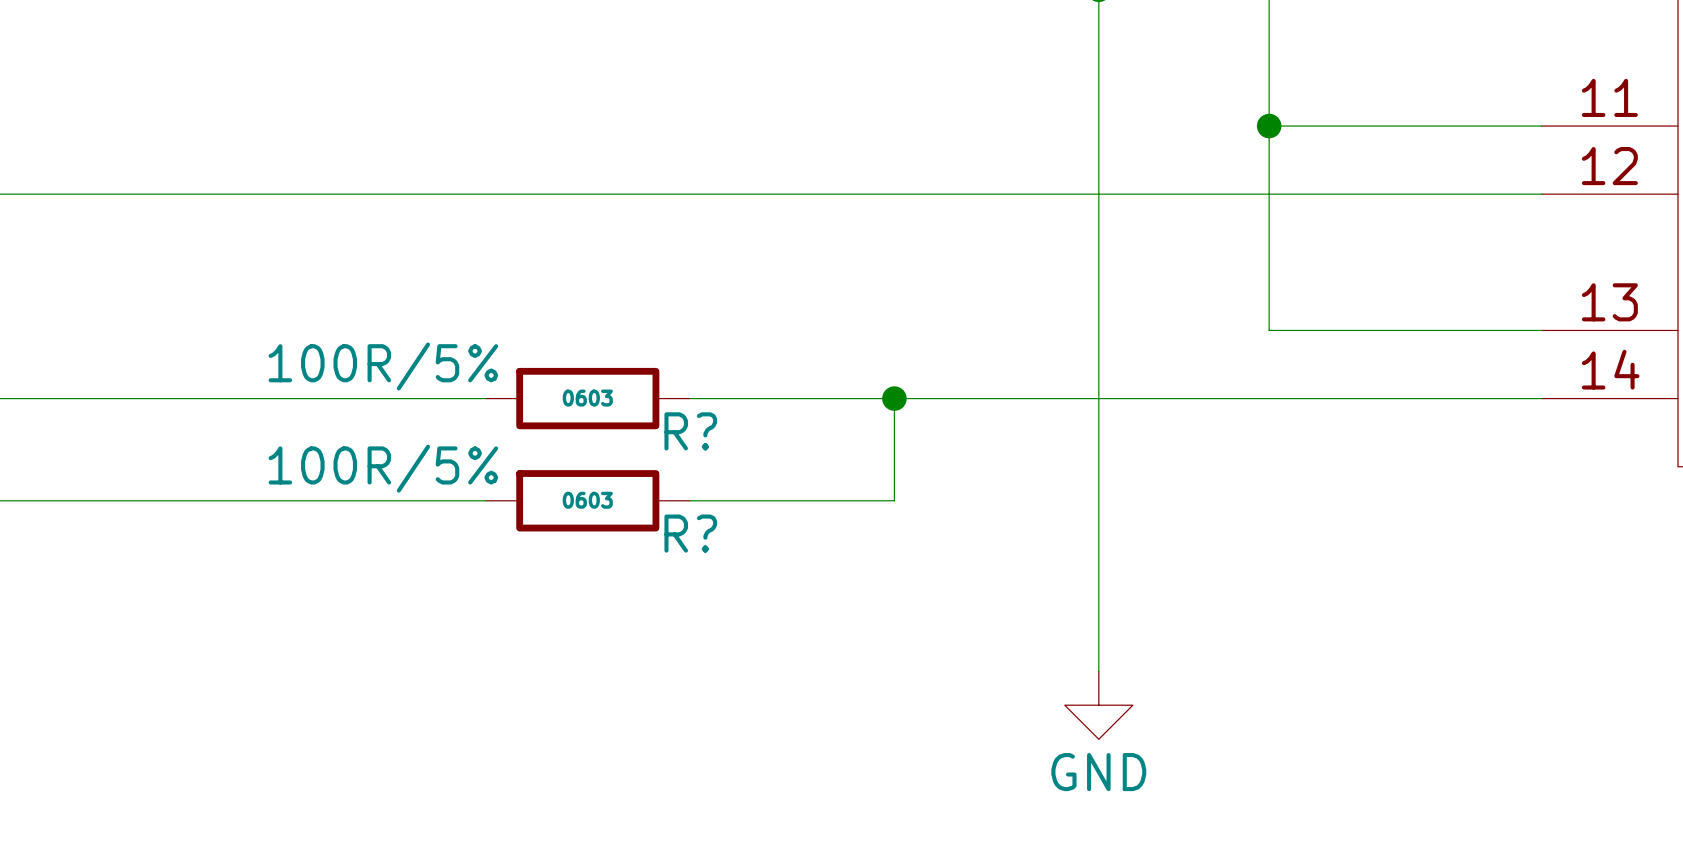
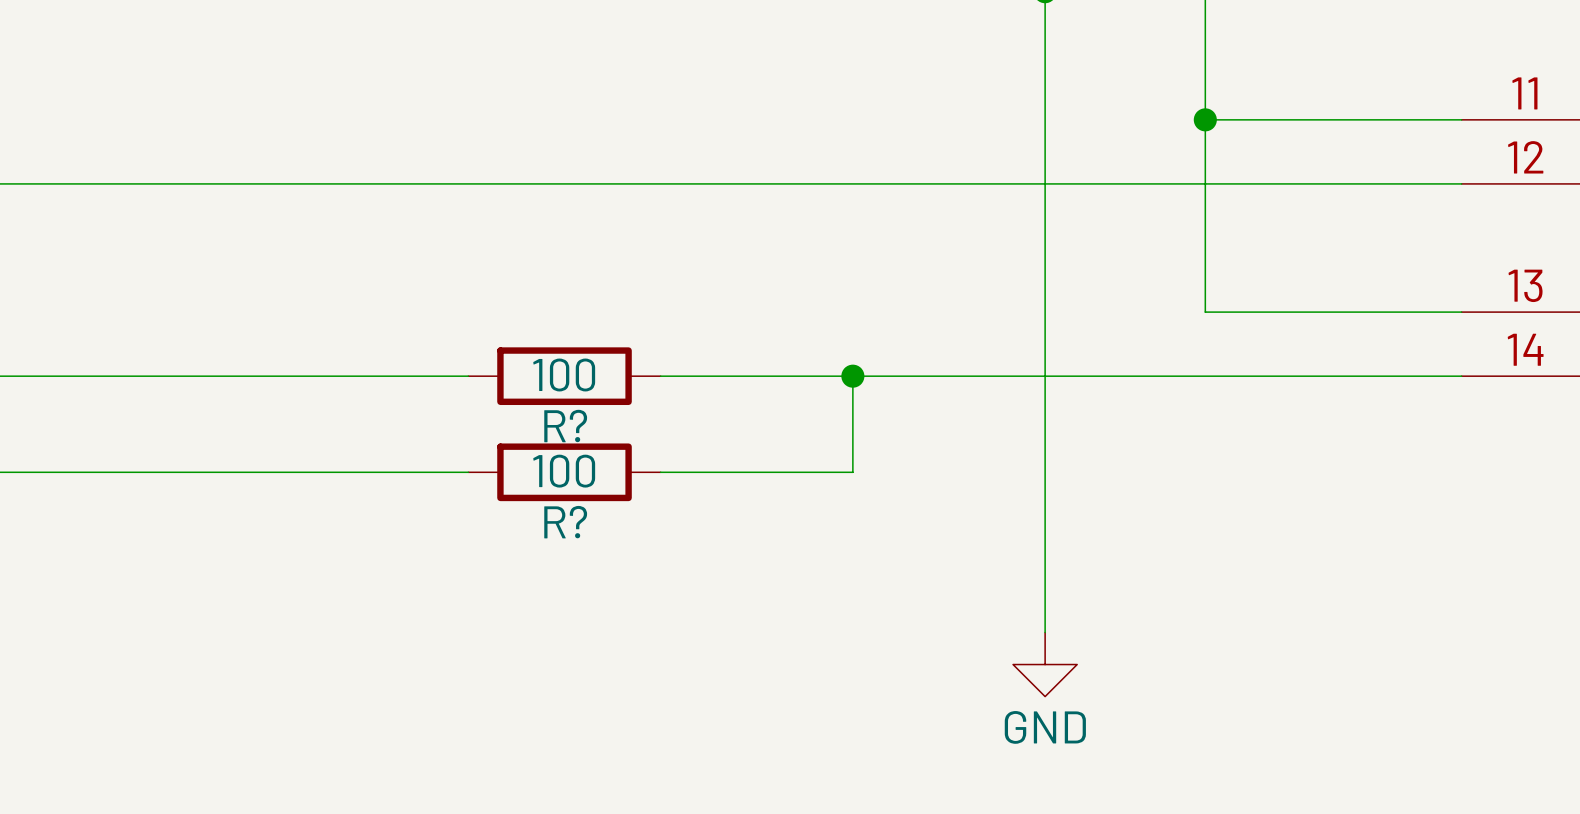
R? value: 100R/5% (383, 366) -> 100 (564, 375)
R? text: 0603 (587, 398) -> none
R? name position: R? (690, 431) -> R? (565, 426)
R? value: 100R/5% (383, 468) -> 100 (564, 471)
R? text: 0603 (587, 500) -> none
R? name position: R? (690, 533) -> R? (565, 522)

